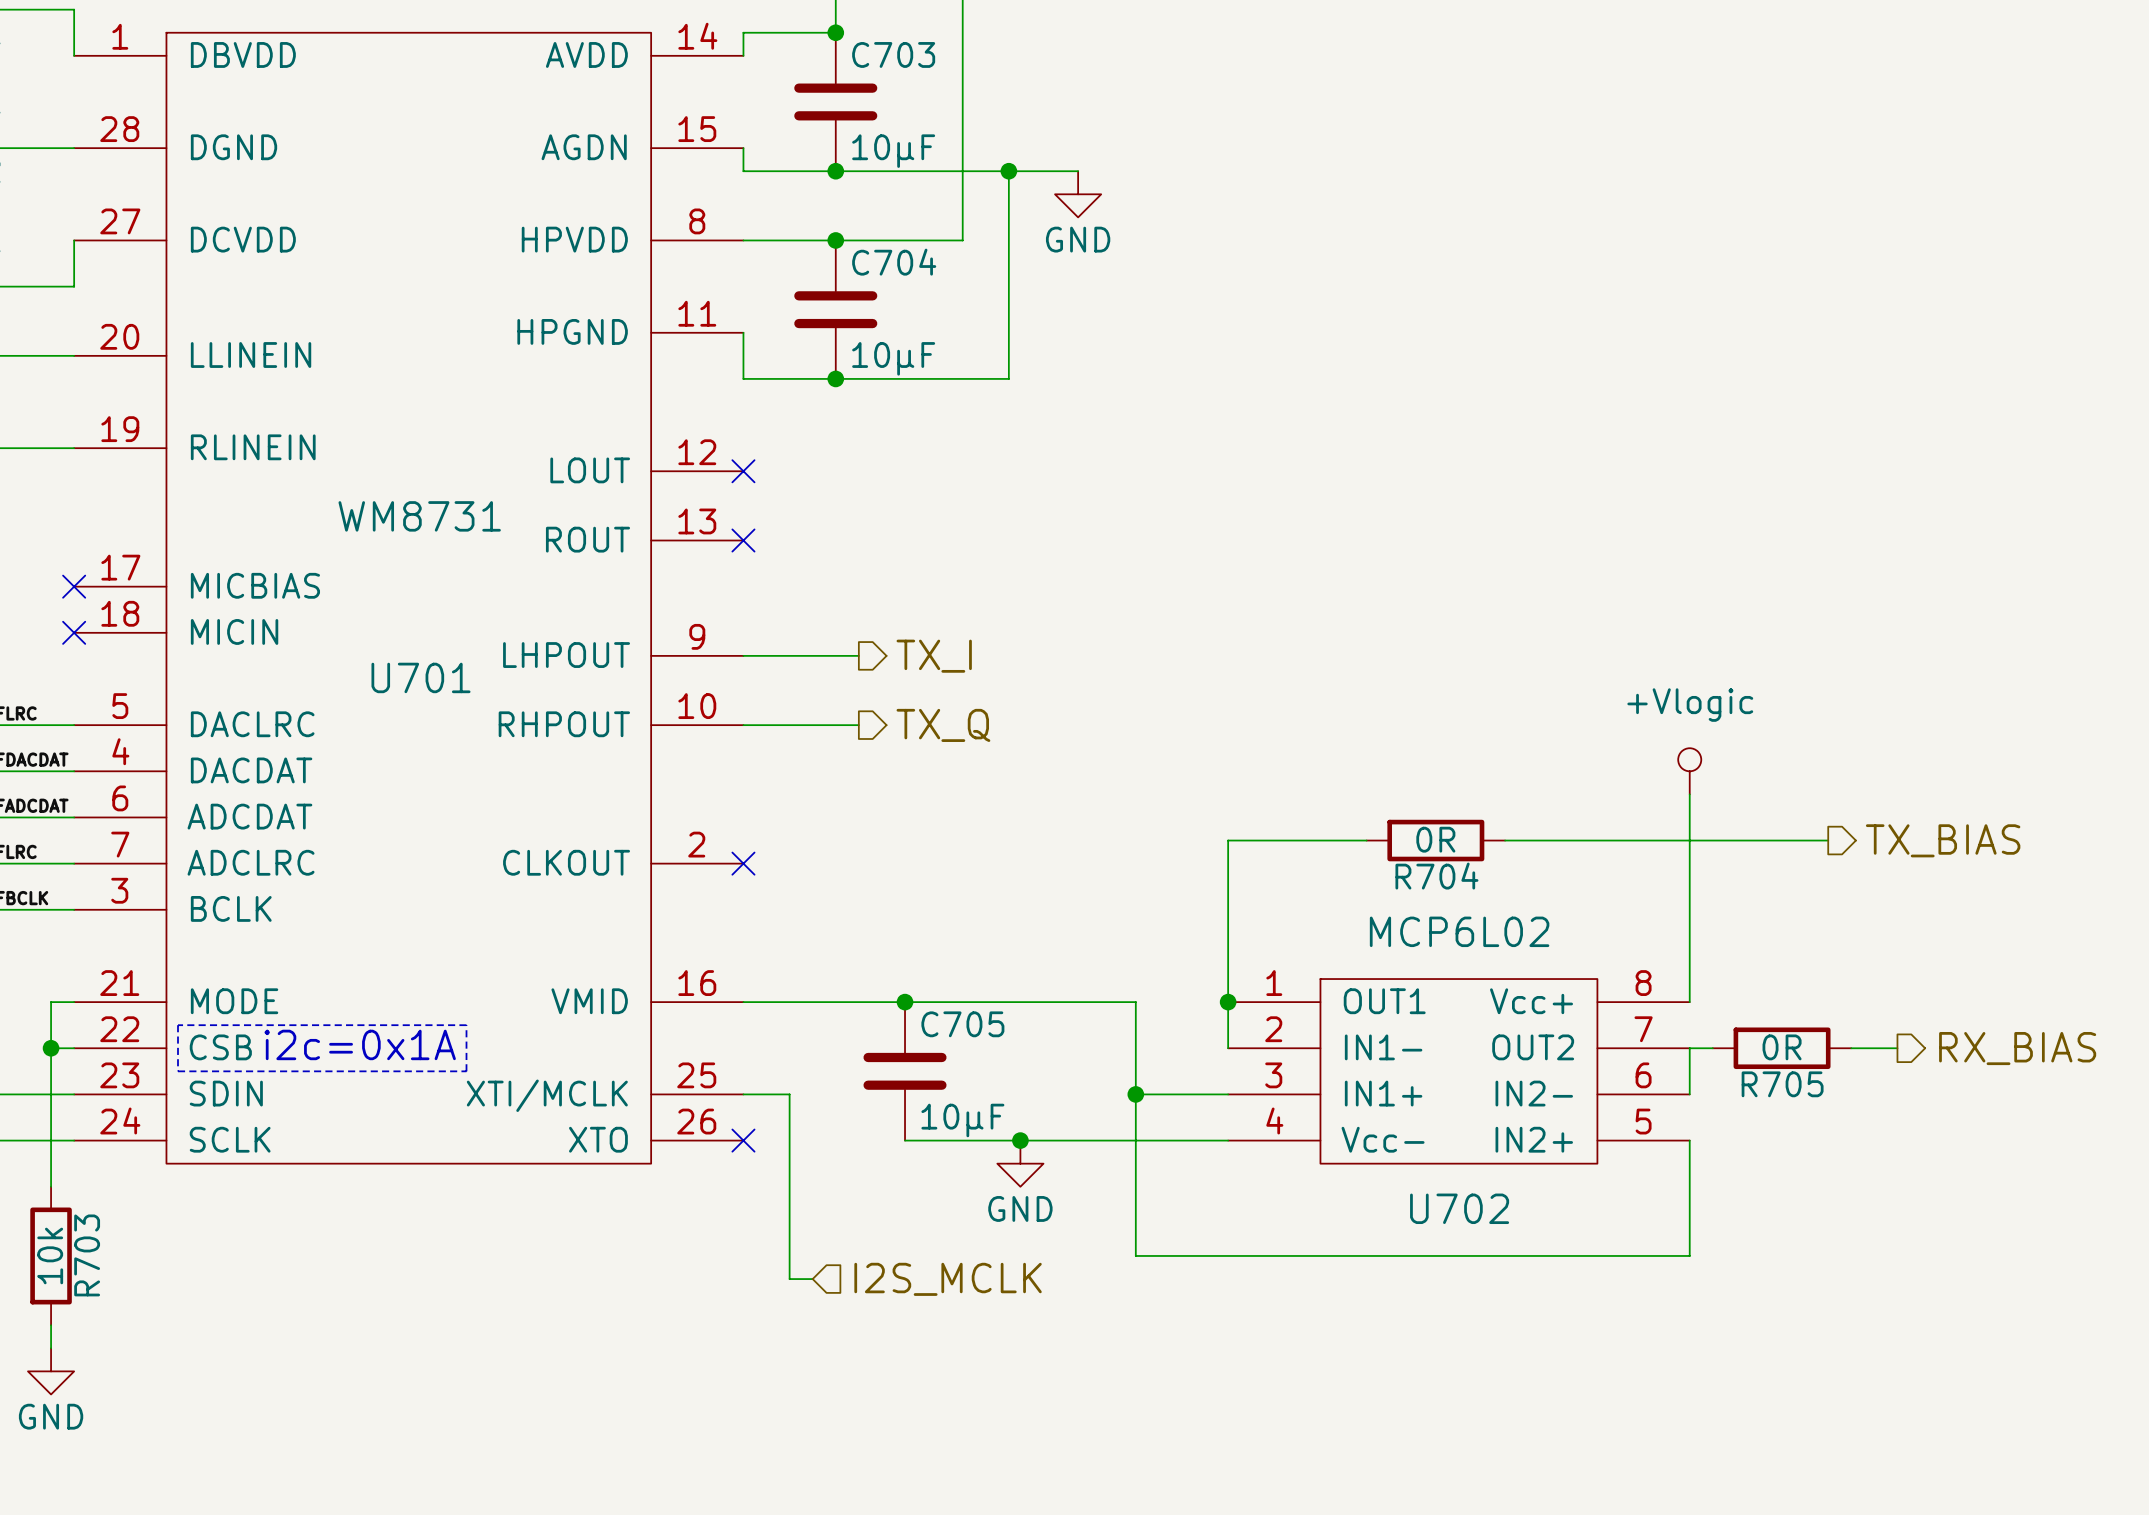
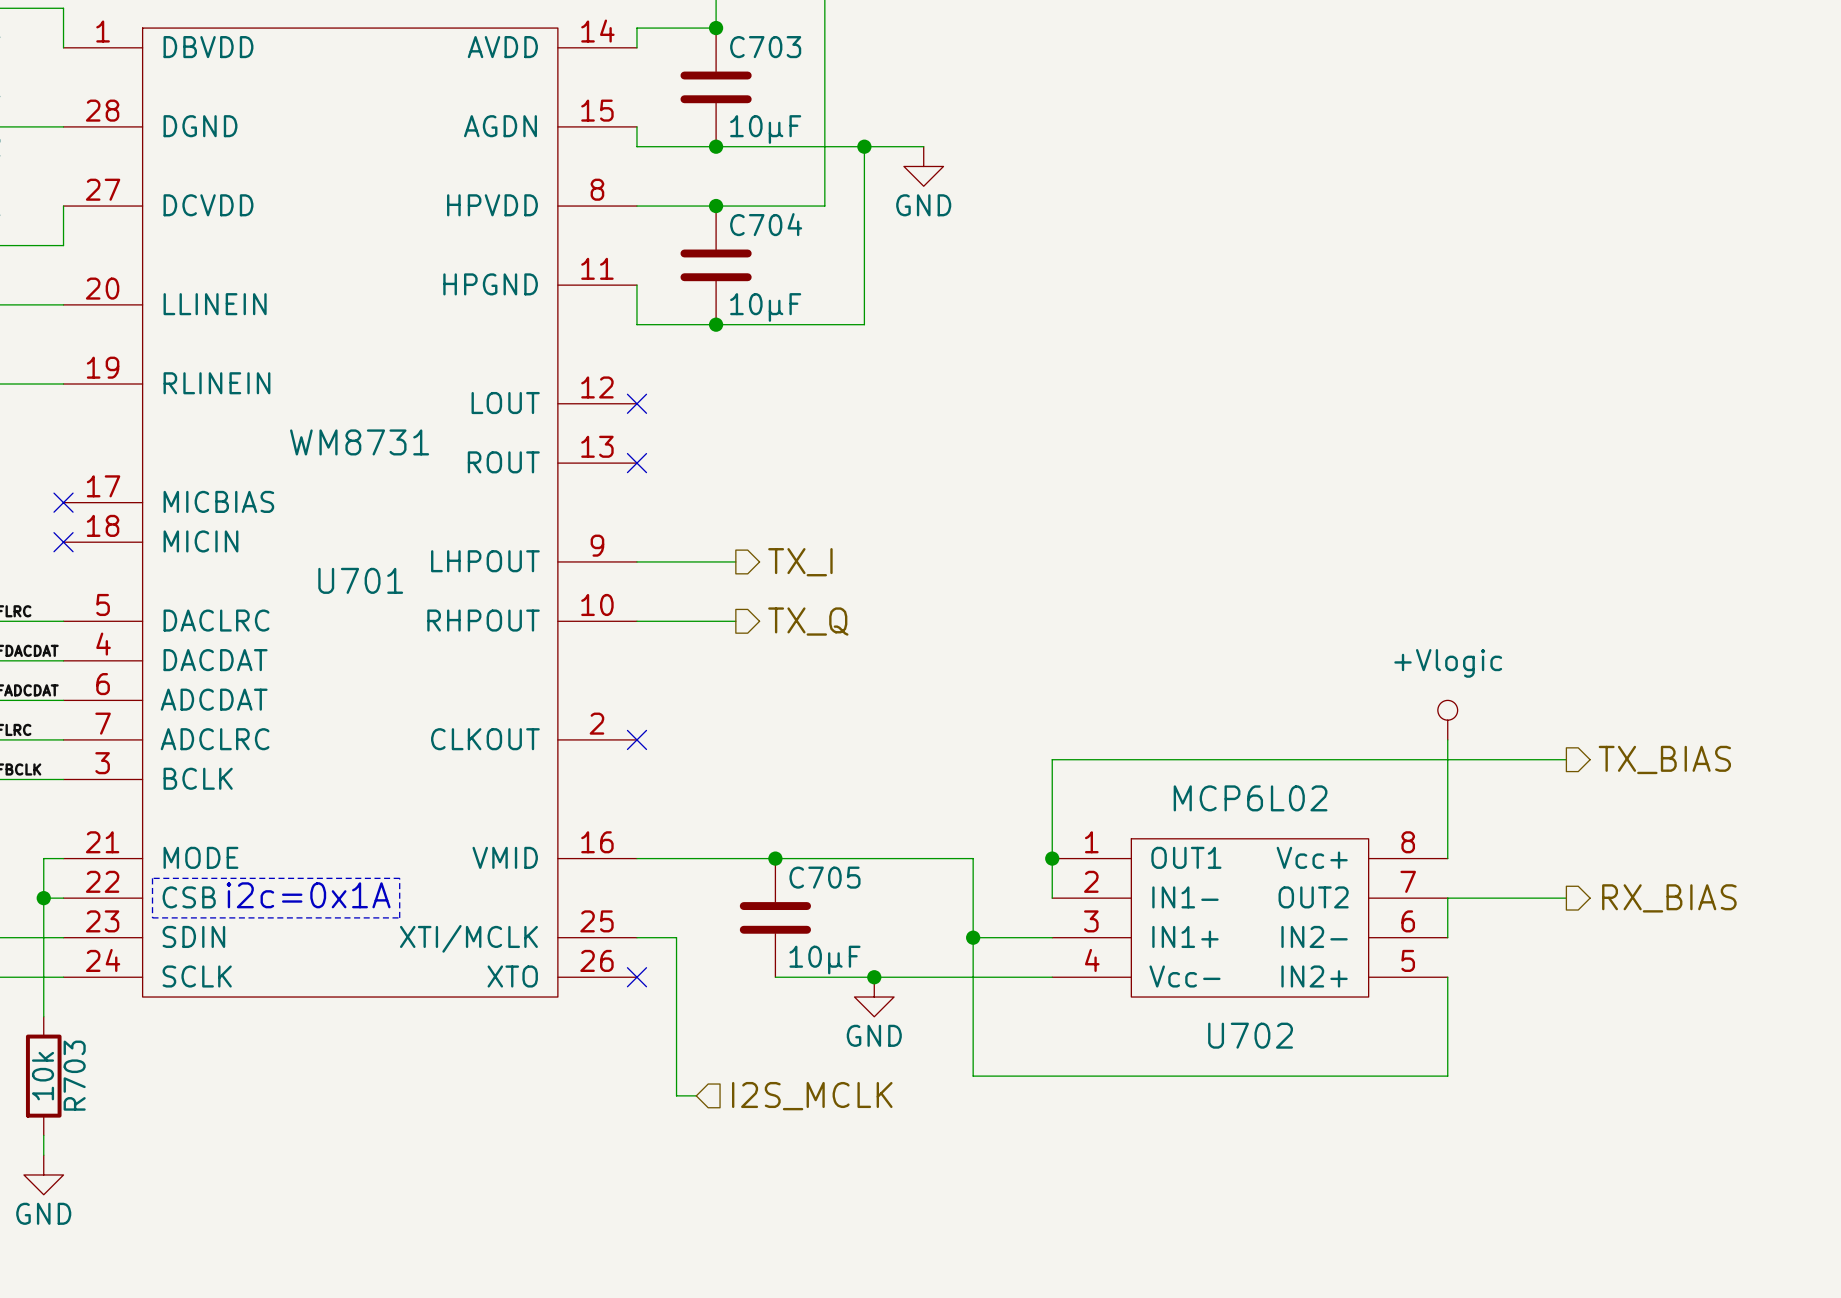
power symbol position: +Vlogic (1689, 771) -> +Vlogic (1447, 720)
wire: (1689, 794) (1689, 863) -> none
wire: (1366, 840) (1228, 840) (1228, 886) -> (1566, 759) (1052, 759)
R704: 0R (1435, 840) -> none
wire: (1505, 840) (1828, 840) -> none
hierarchical label position: TX_BIAS (1943, 840) -> TX_BIAS (1664, 759)
wire: none -> (1467, 898) (1566, 898)
R705: 0R (1782, 1048) -> none
wire: (1851, 1048) (1897, 1048) -> none
hierarchical label position: RX_BIAS (2017, 1048) -> RX_BIAS (1669, 898)

